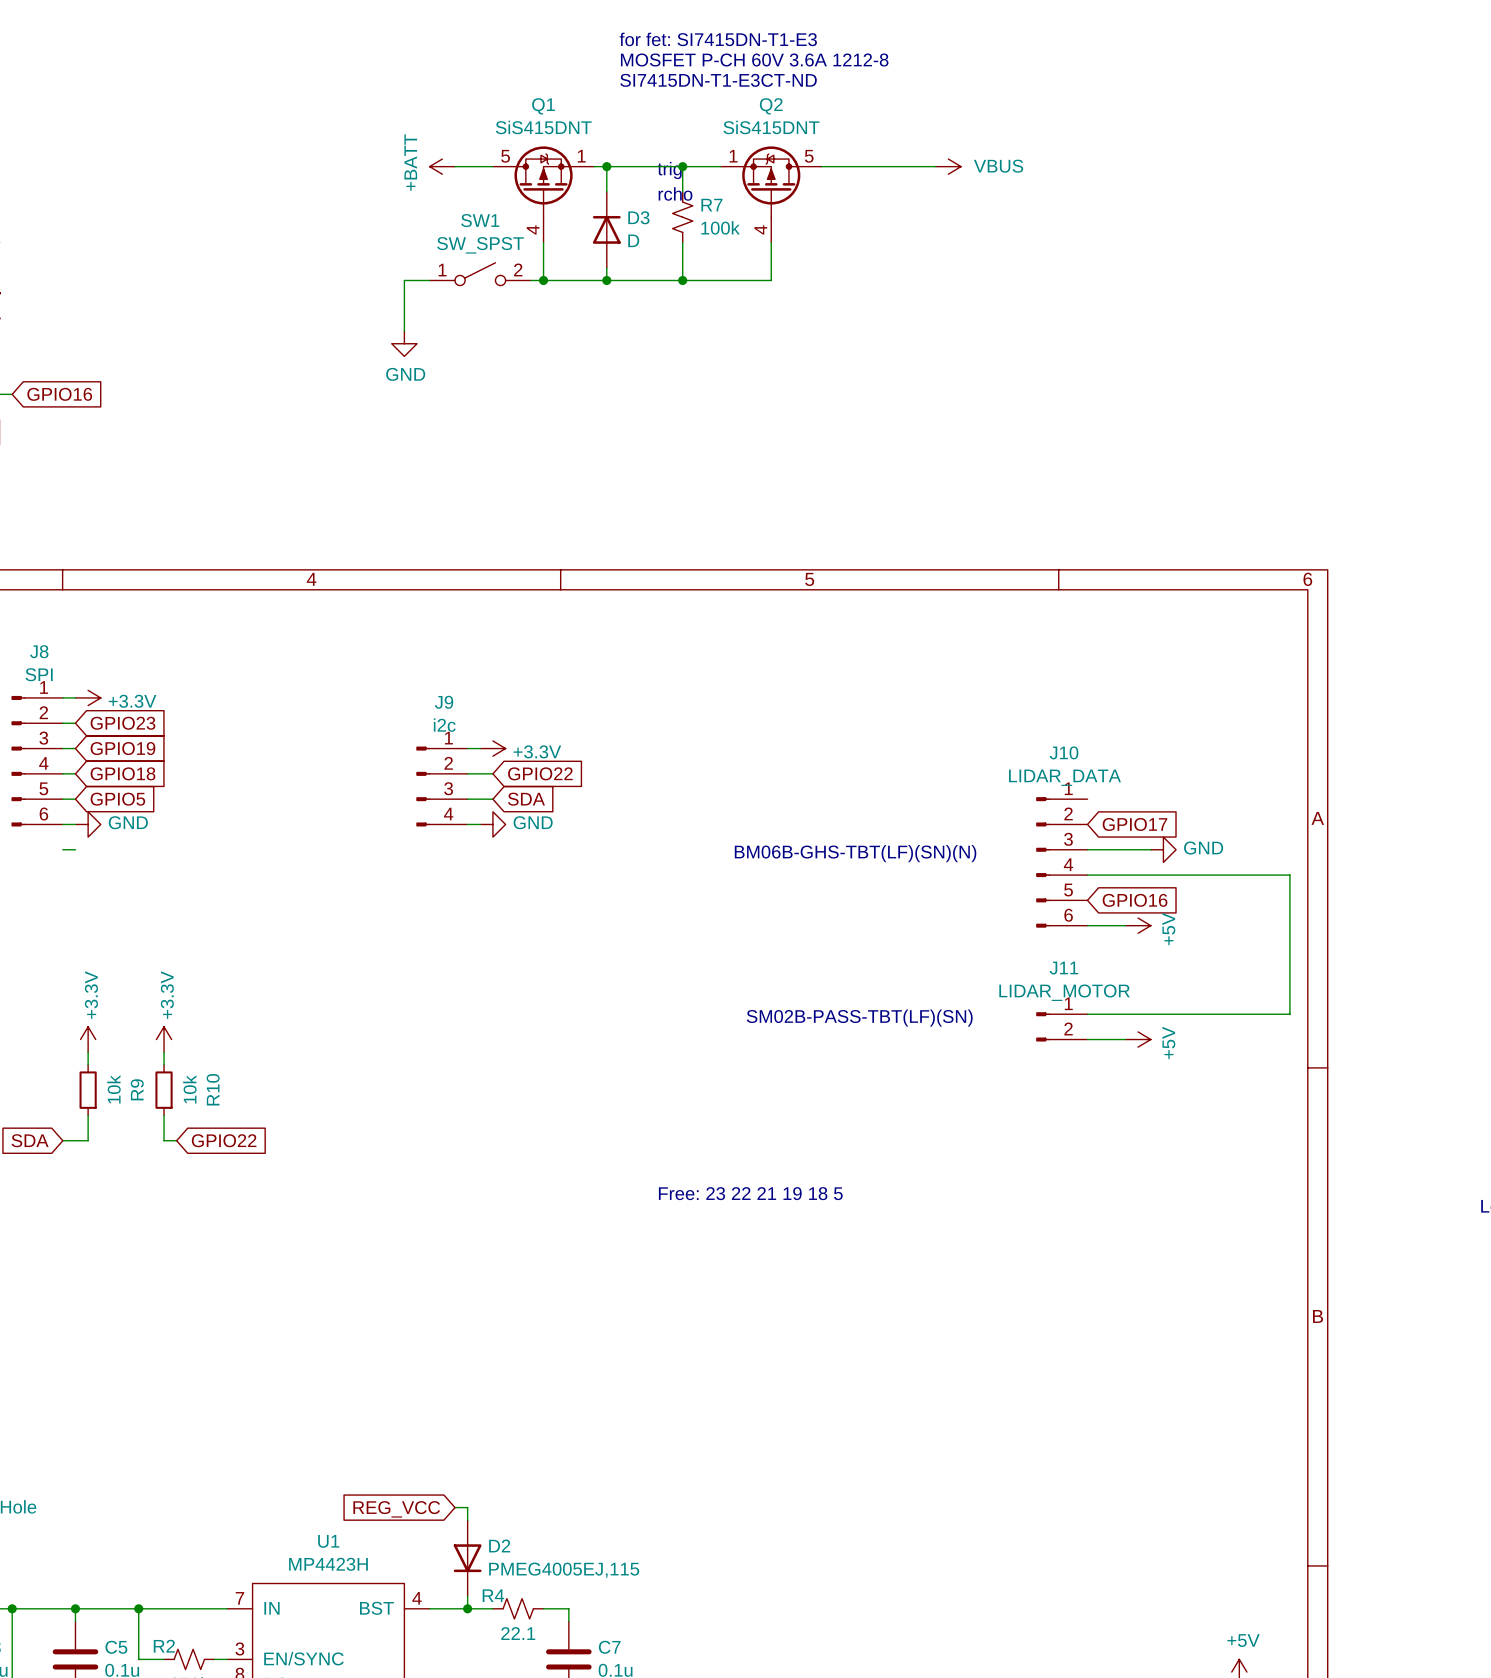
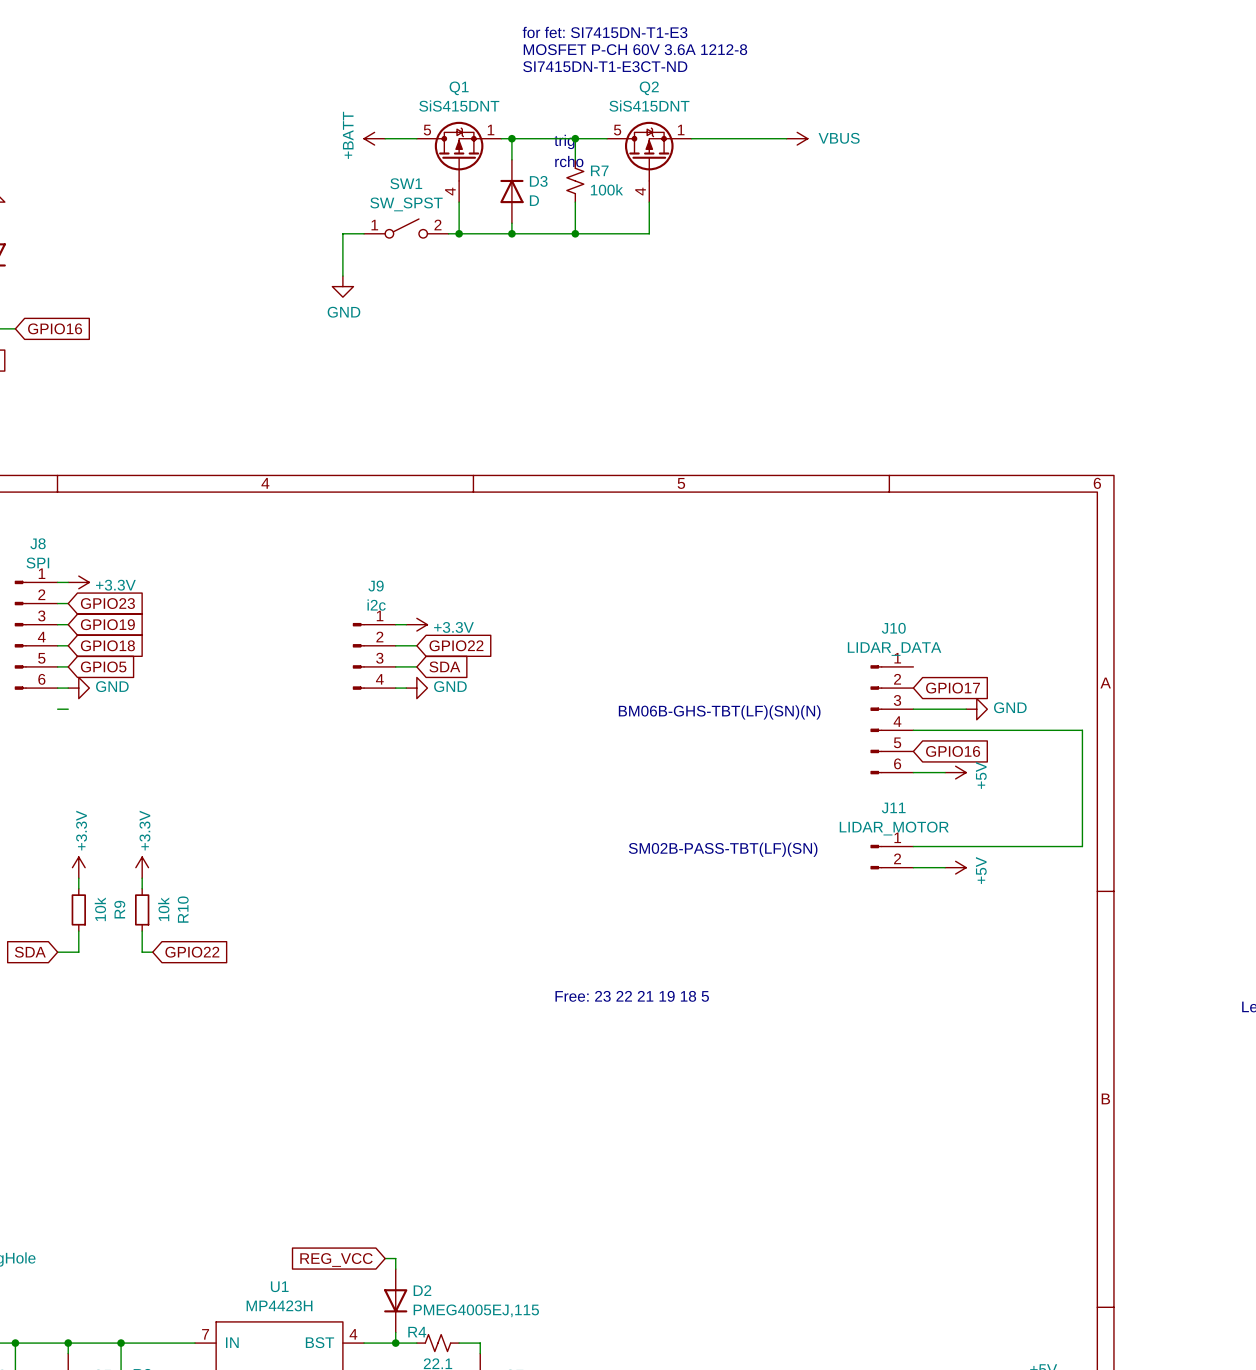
Q2 flip: as is (771, 181) -> left-right (649, 151)

